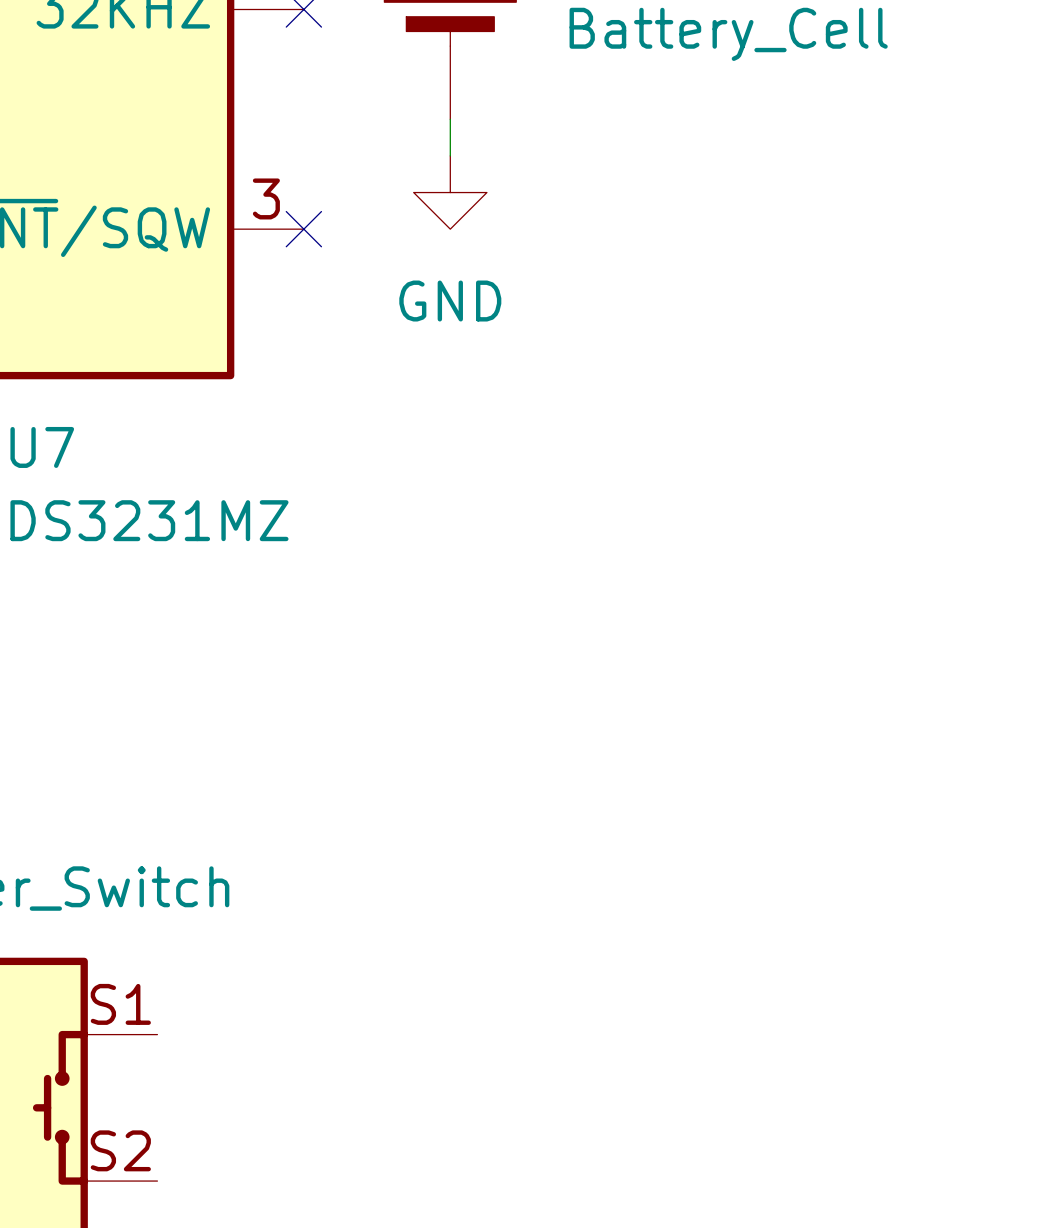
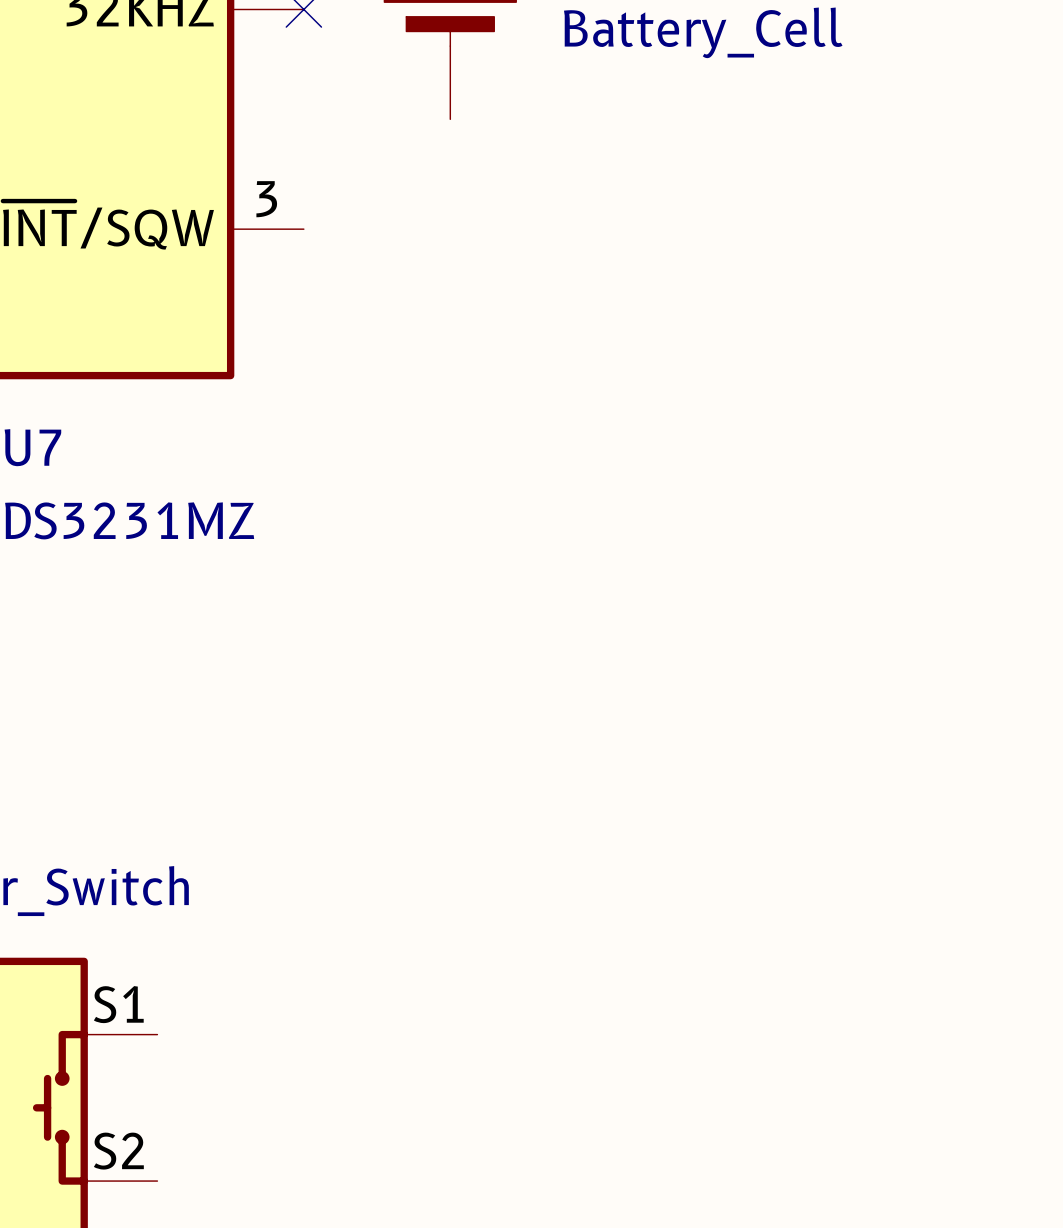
wire: (450, 119) (450, 155) -> none
power symbol: GND (450, 192) -> none
no-connect mark: (303, 229) -> none

